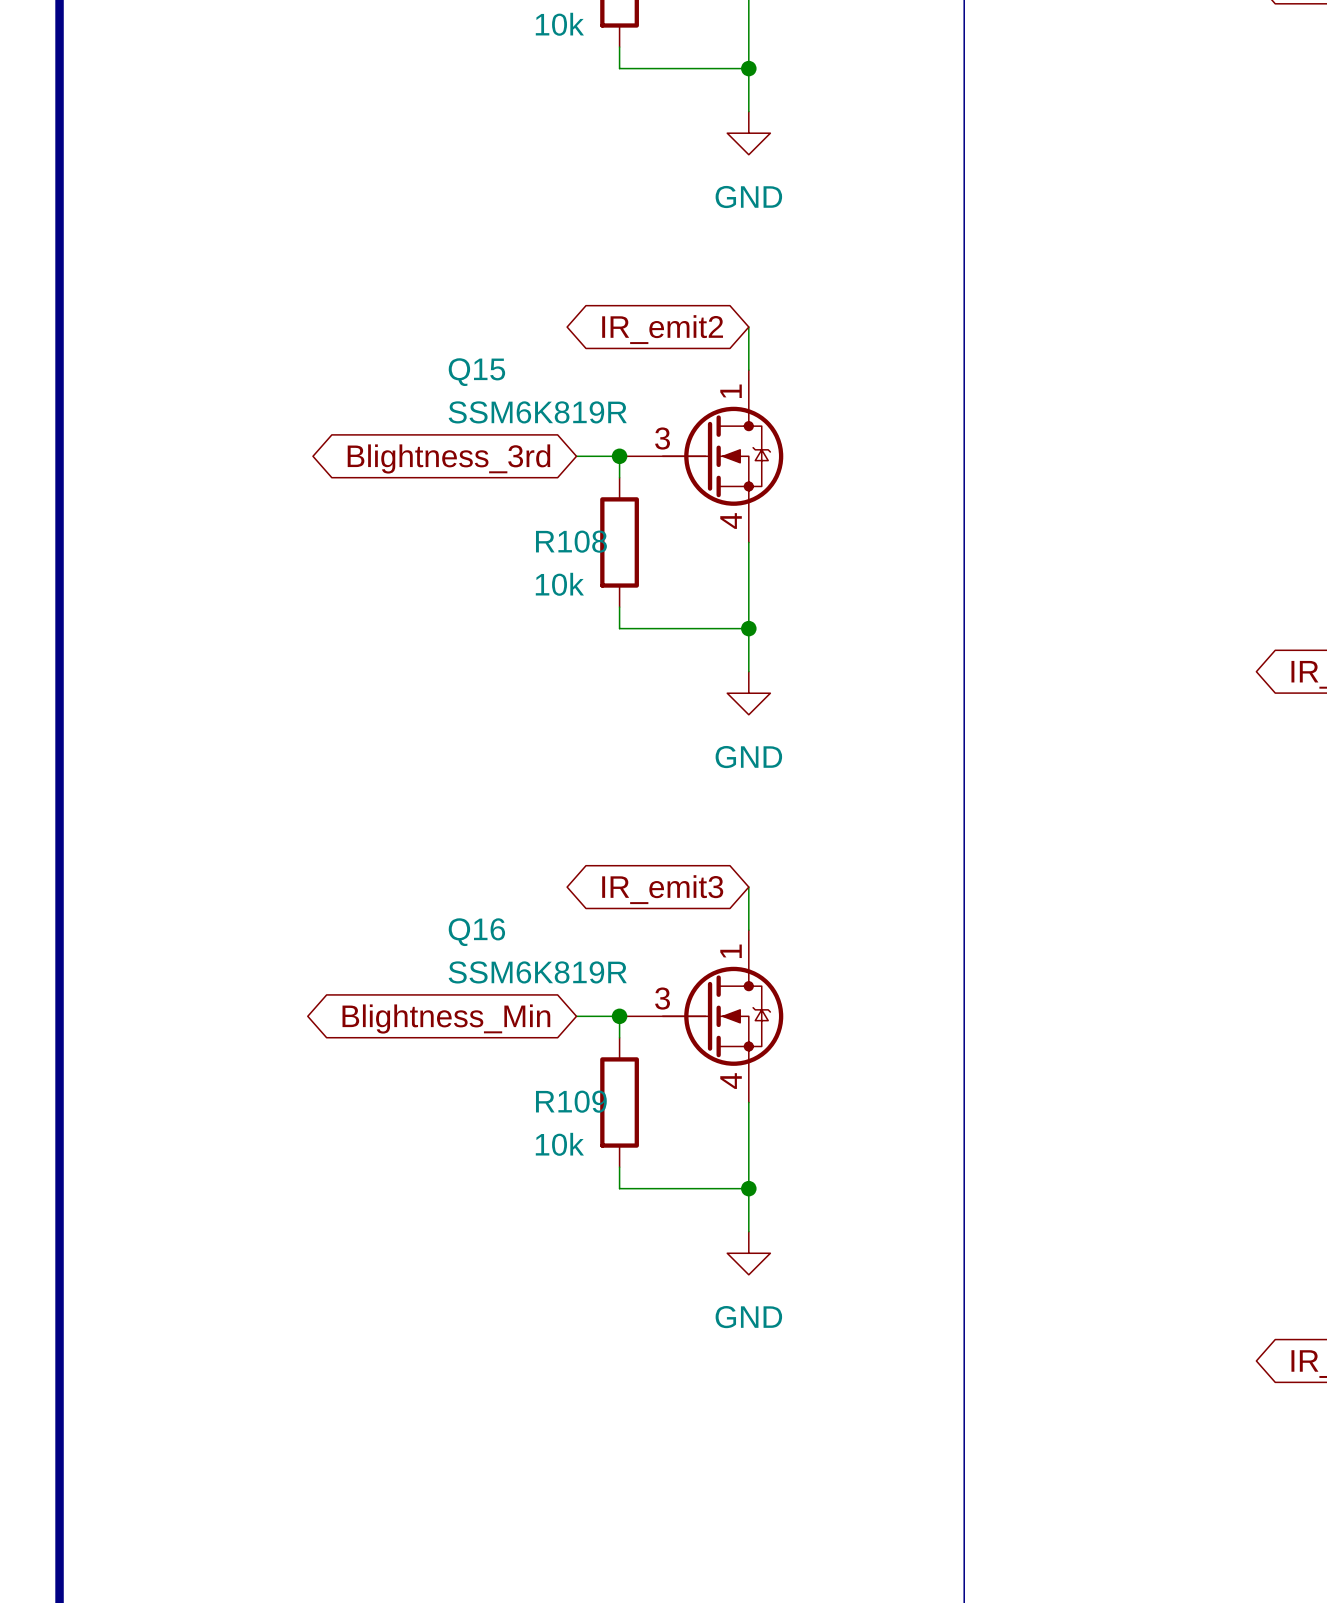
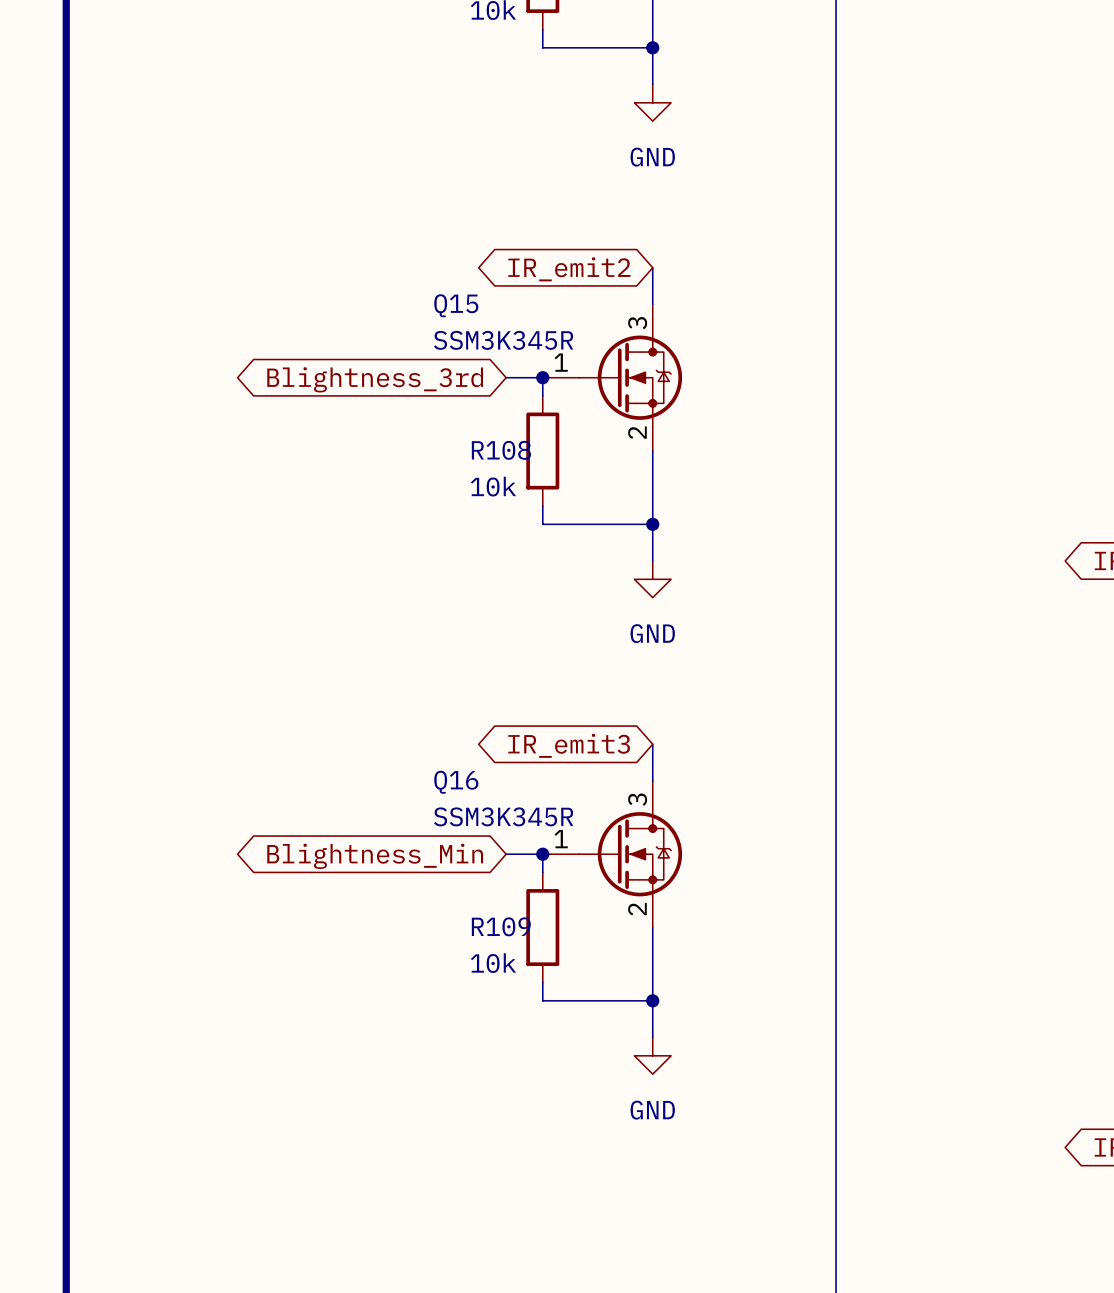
Q15 symbol: [619, 370, 784, 543] -> [542, 304, 683, 452]
Q15 name position: Q15 (476, 372) -> Q15 (456, 305)
Q15 value: SSM6K819R (537, 412) -> SSM3K345R (503, 340)
Q16 symbol: [619, 930, 784, 1103] -> [542, 780, 683, 928]
Q16 name position: Q16 (476, 932) -> Q16 (456, 782)
Q16 value: SSM6K819R (537, 972) -> SSM3K345R (503, 816)

